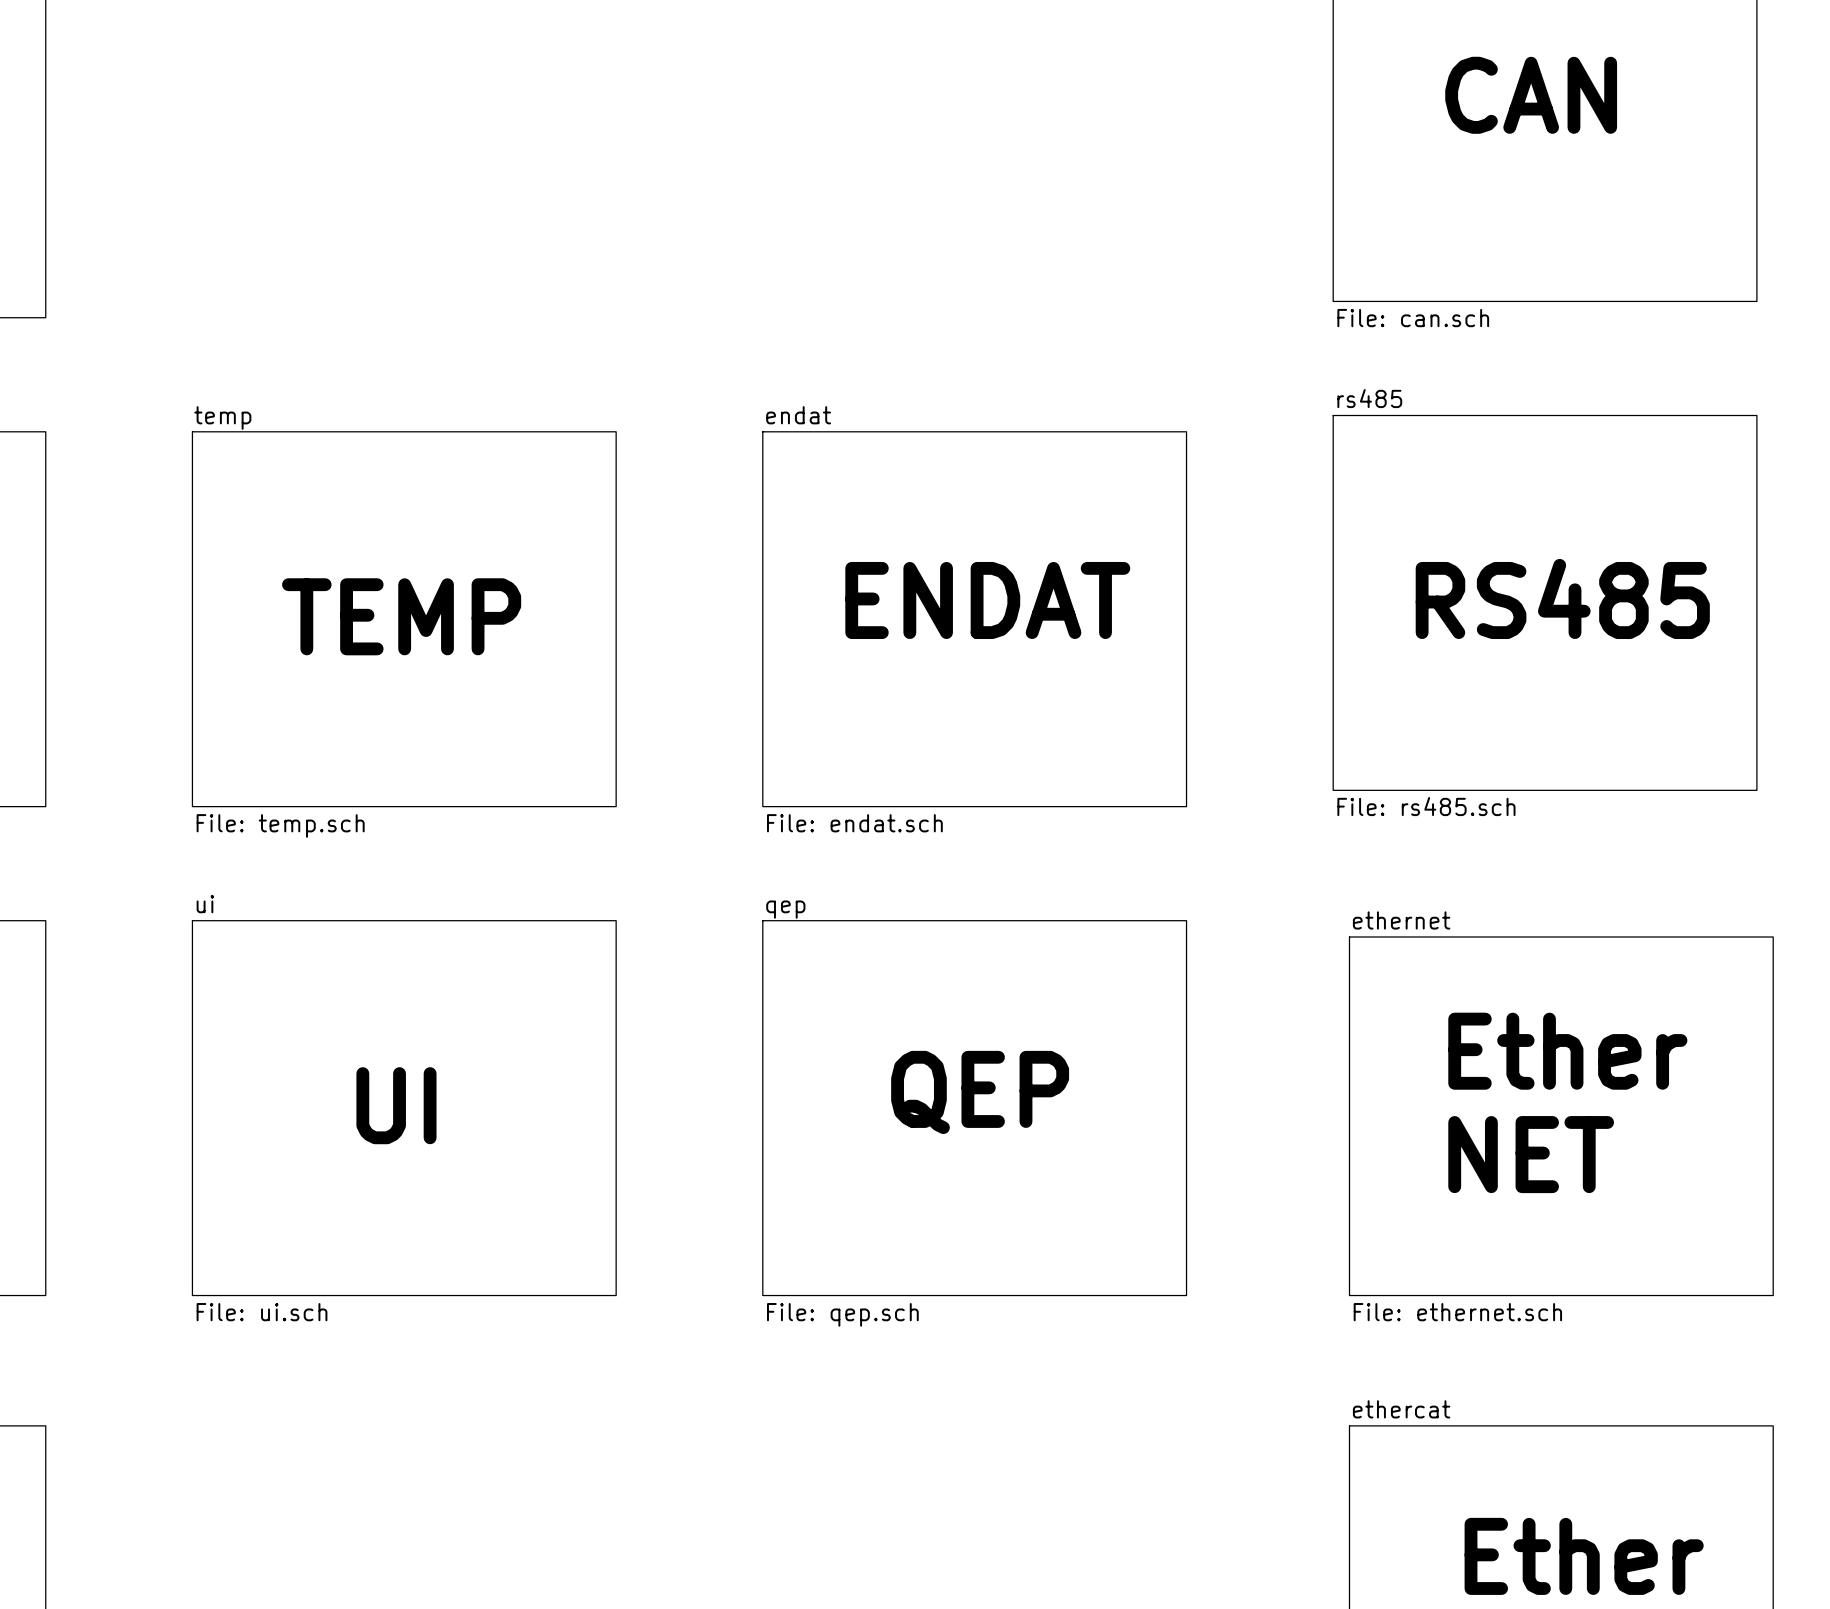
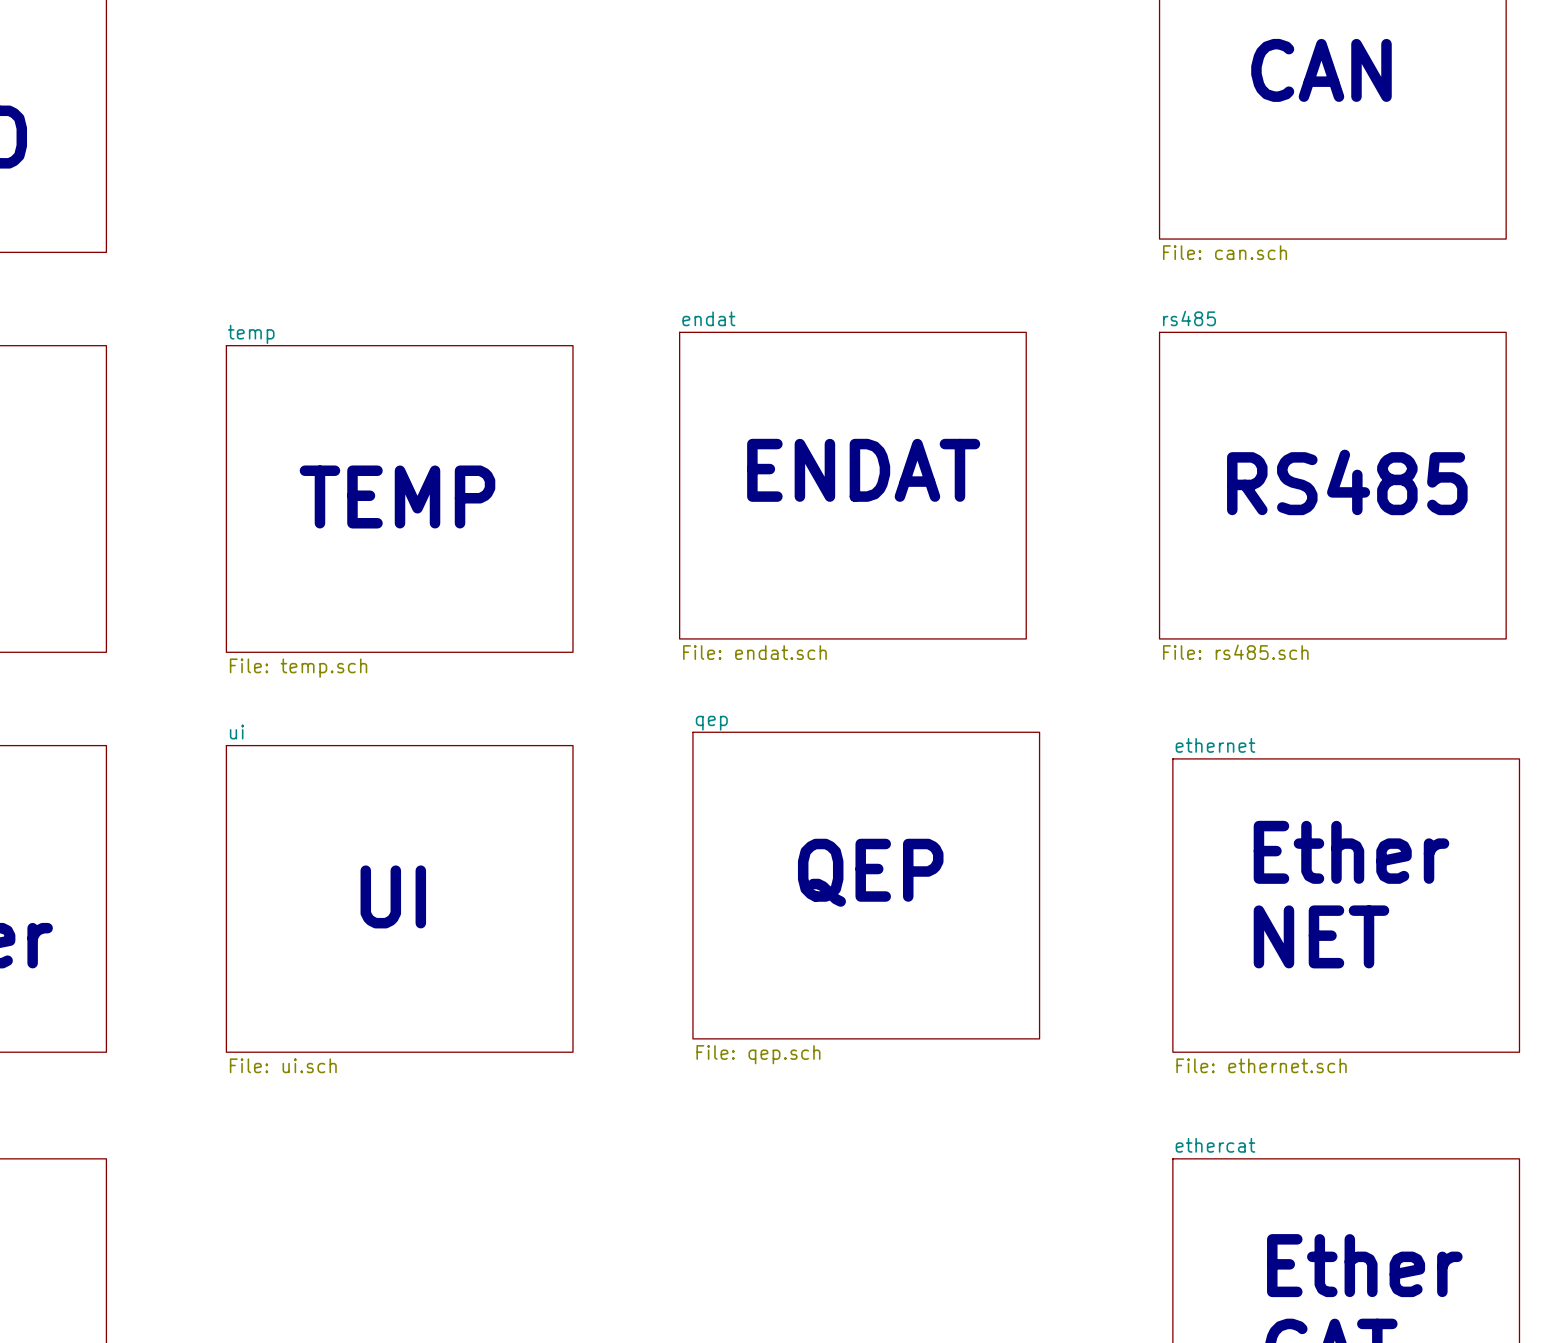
text position: ENDAT (987, 600) -> ENDAT (863, 470)
sheet endat position: (974, 619) -> (852, 485)
text position: QEP (980, 1092) -> QEP (870, 872)
sheet qep position: (974, 1108) -> (866, 885)

